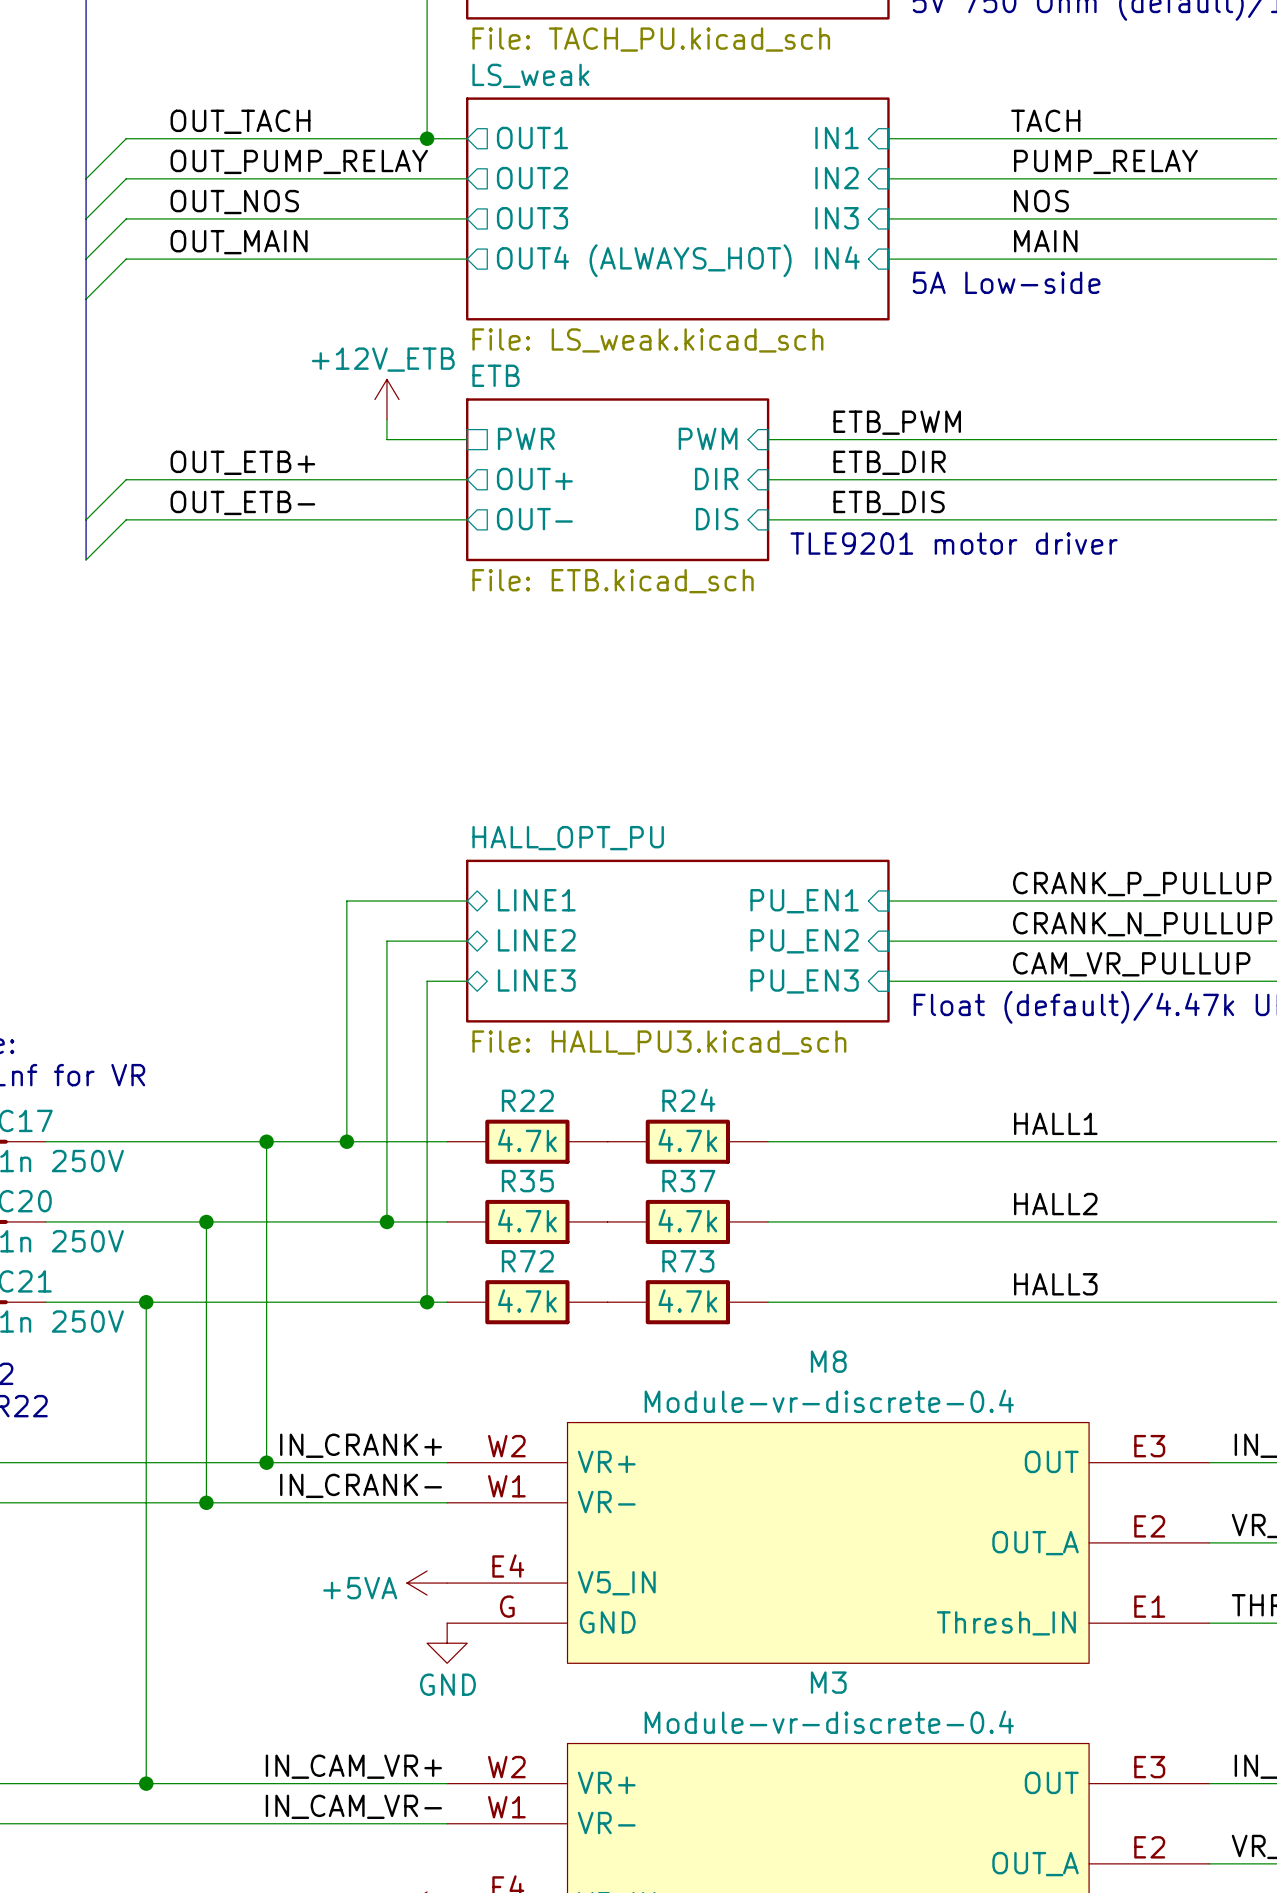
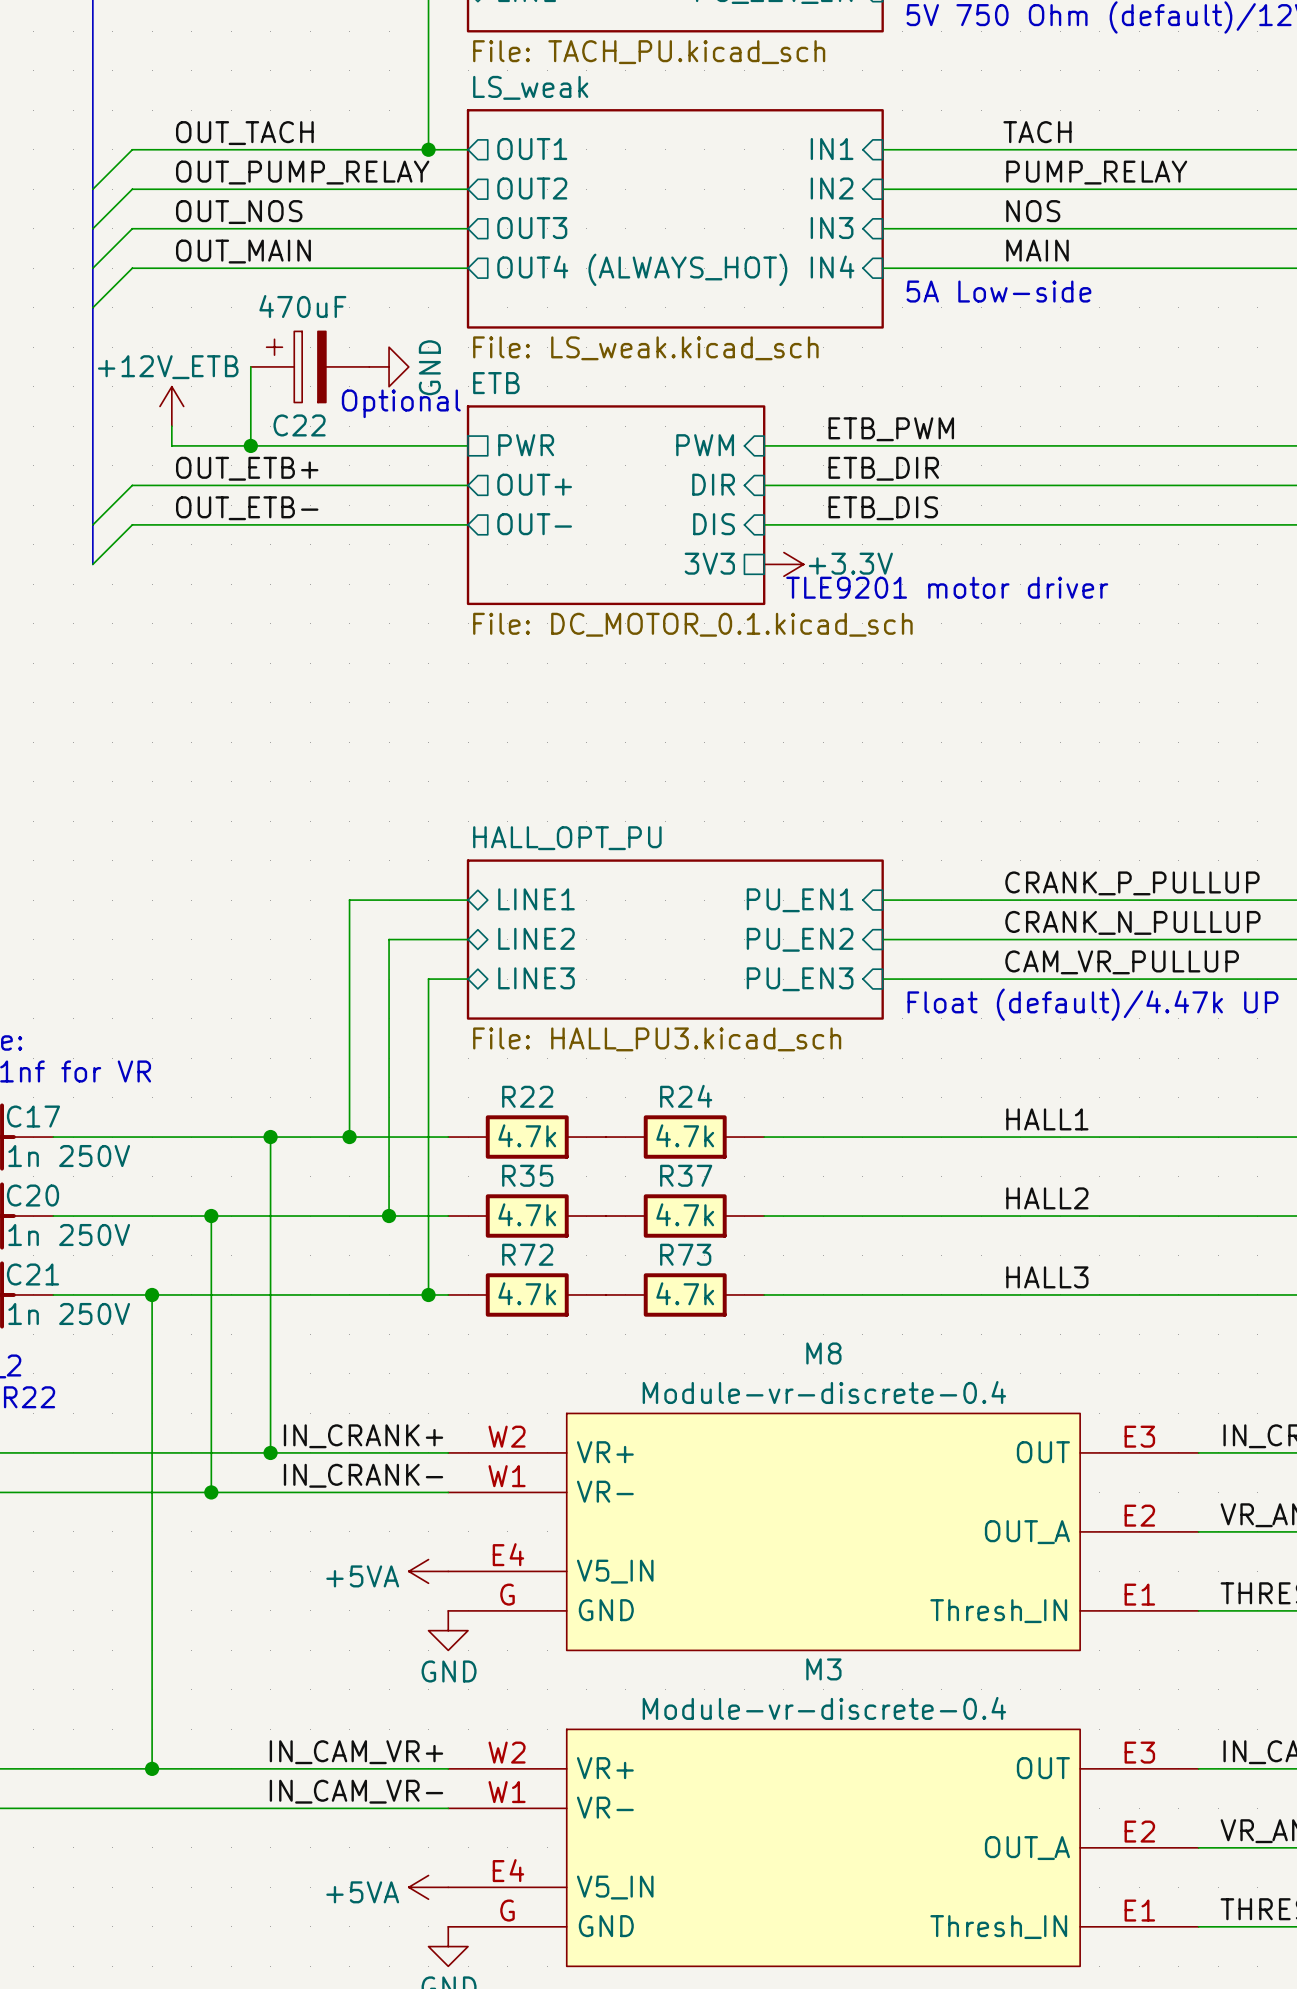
wire: none -> (250, 366) (250, 445)
C22: none -> 470uF (310, 366)
power symbol: none -> GND (389, 366)
text: none -> Optional (401, 403)
power symbol position: +12V_ETB (386, 399) -> +12V_ETB (171, 406)
wire: (386, 419) (386, 439) -> (171, 426) (171, 445) (389, 445)
junction: none -> (250, 445)
sheet ETB: File: ETB.kicad_sch (617, 479) -> none
sheet ETB: none -> File: DC_MOTOR_0.1.kicad_sch (616, 505)
text position: TLE9201 motor driver (954, 543) -> TLE9201 motor driver (947, 587)
sheet pin: none -> 3V3 (709, 563)
power symbol: none -> +3.3V (783, 564)

